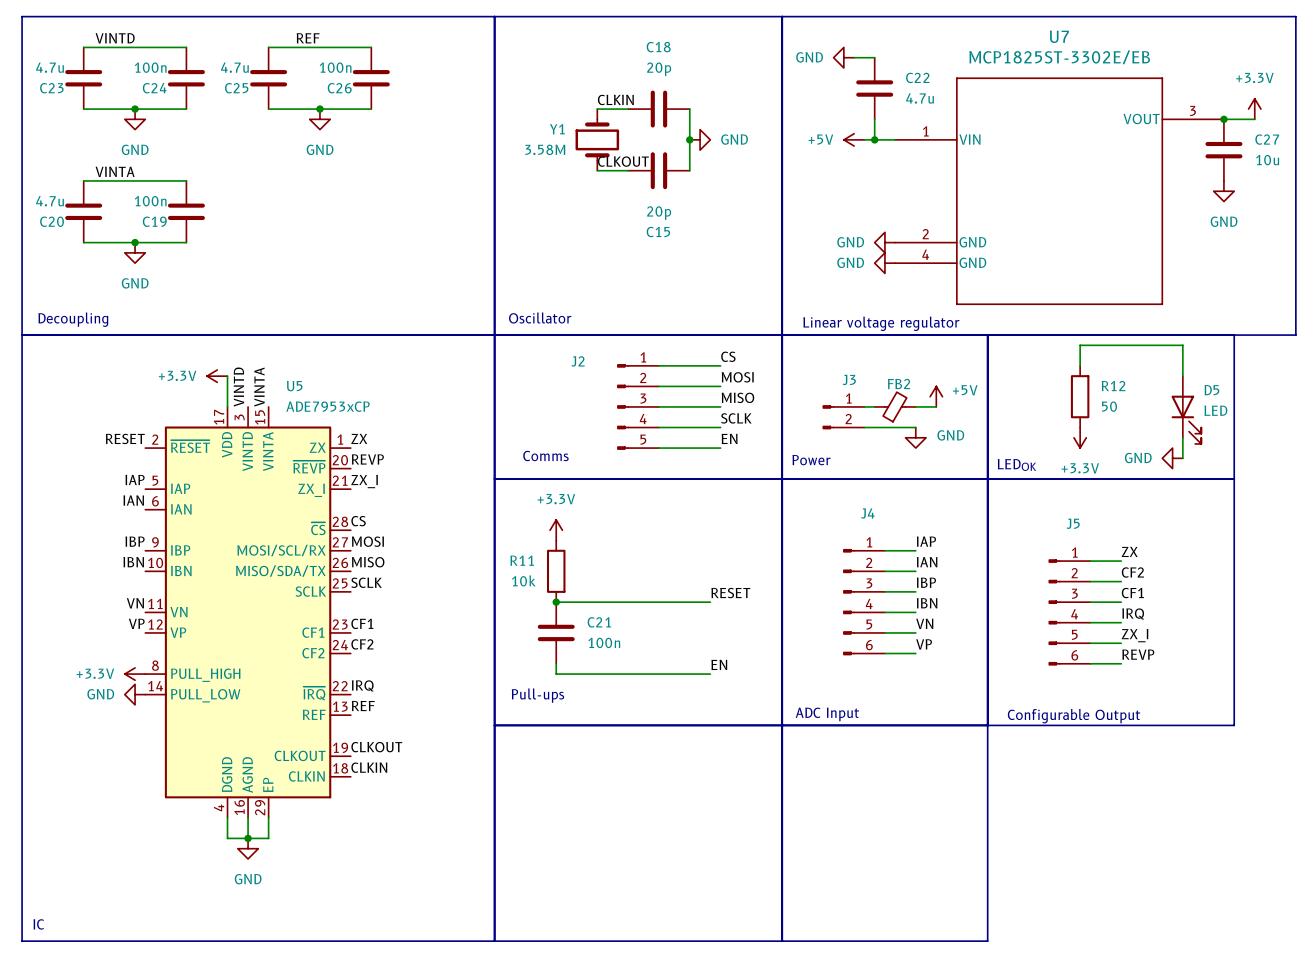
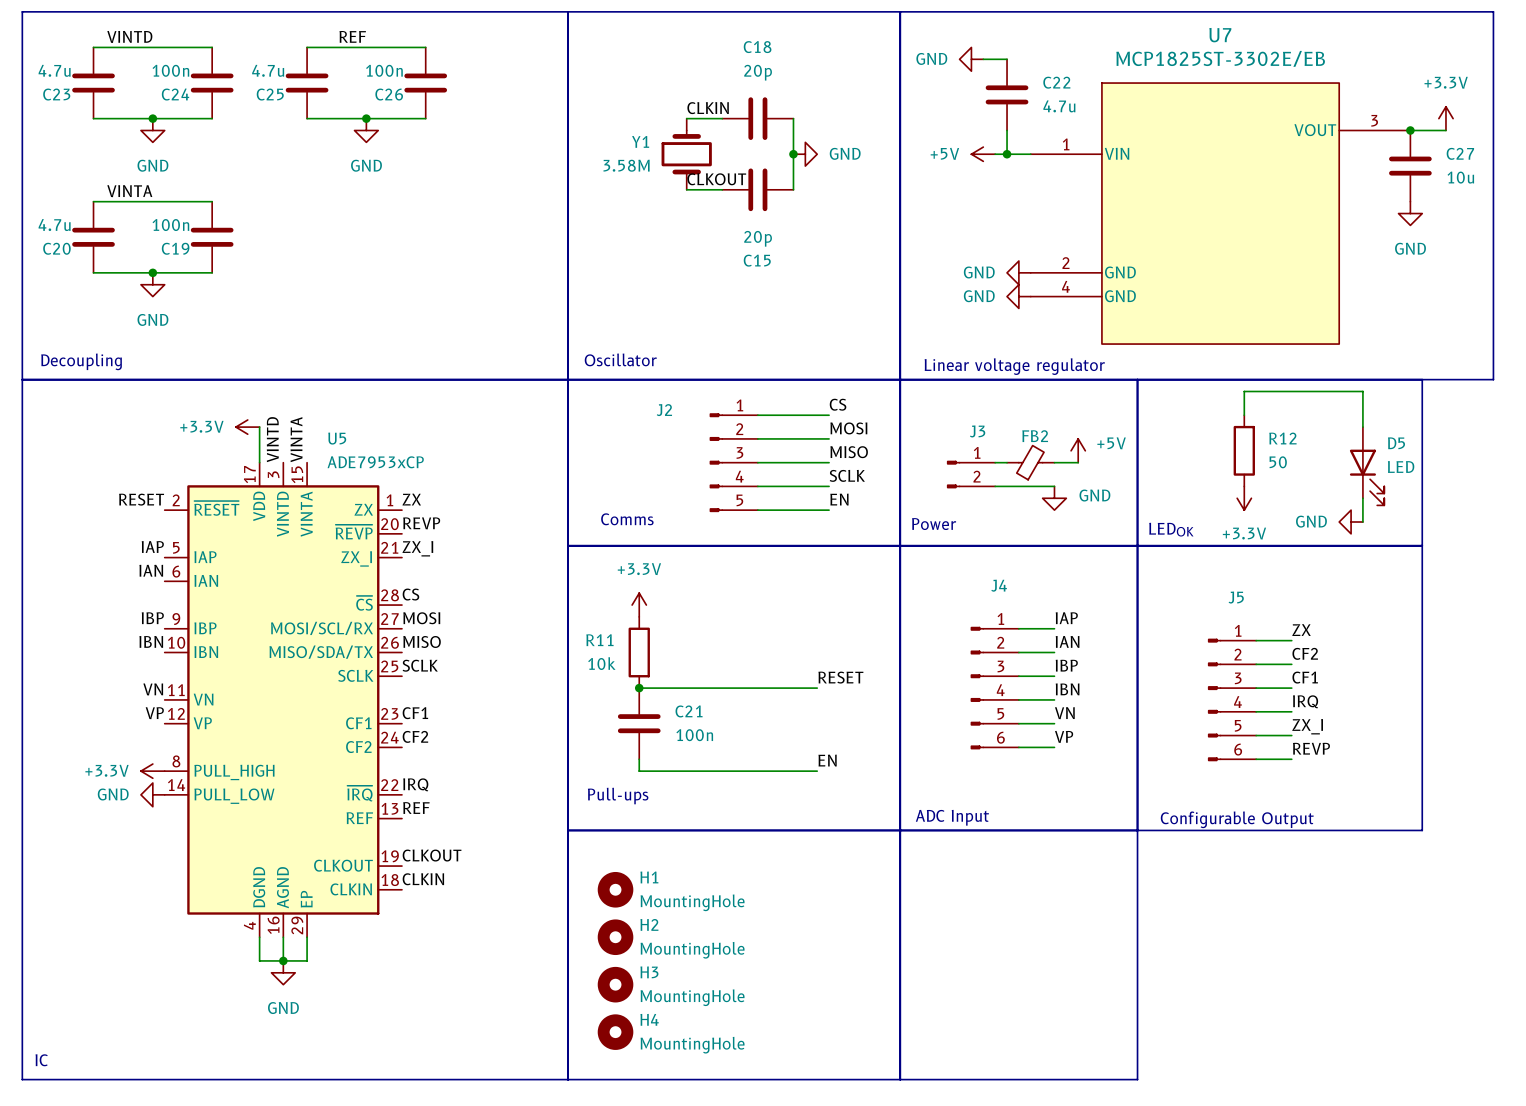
U7 symbol: [895, 77, 1224, 305] -> [1030, 83, 1411, 345]
H1: none -> MountingHole (615, 889)
H2: none -> MountingHole (615, 937)
H3: none -> MountingHole (615, 984)
H4: none -> MountingHole (615, 1032)

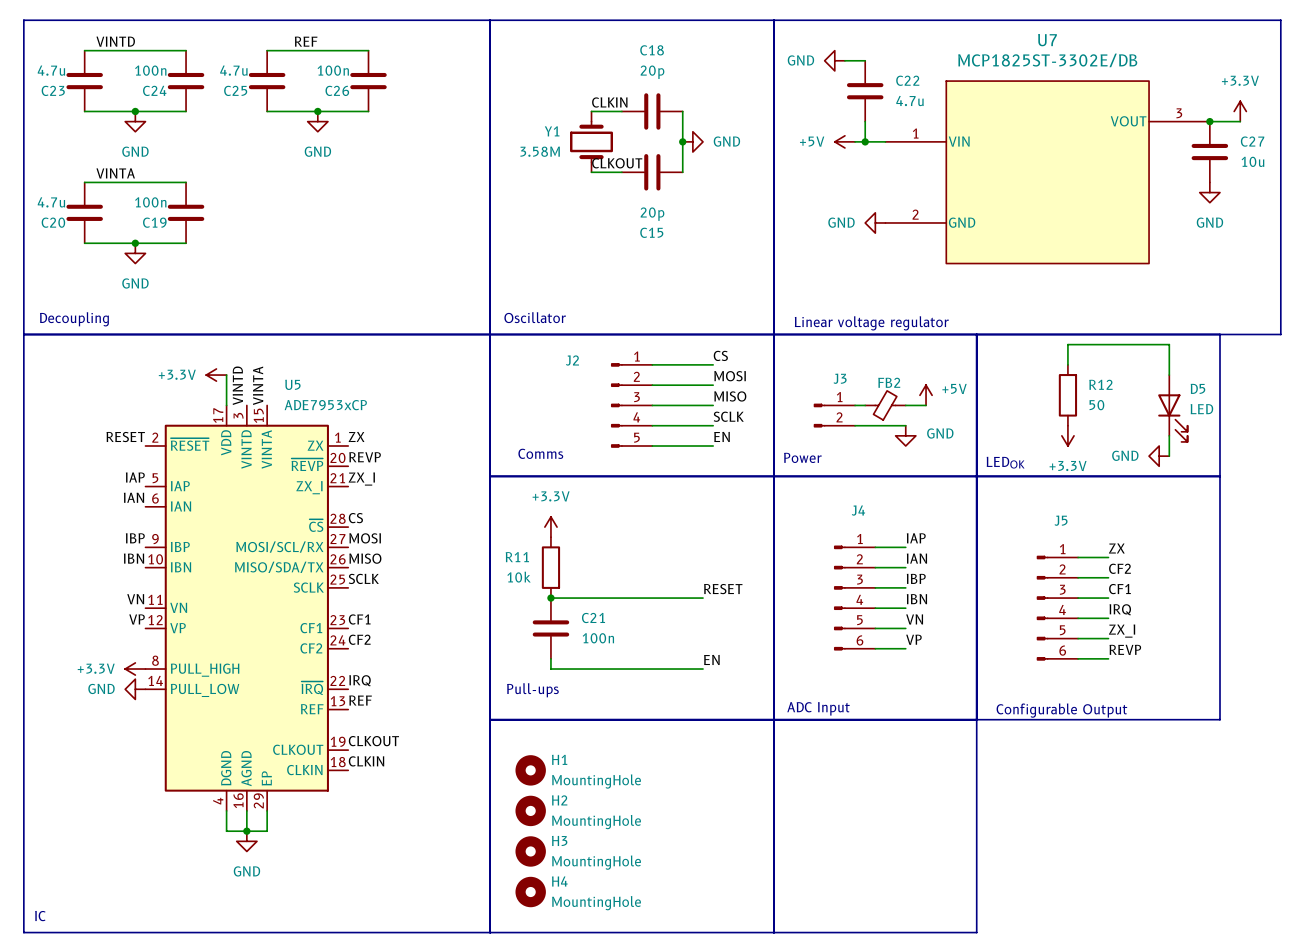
U7 value: MCP1825ST-3302E/EB (1220, 58) -> MCP1825ST-3302E/DB (1047, 60)
U7 symbol: [1030, 83, 1411, 345] -> [885, 81, 1210, 264]
power symbol: none -> GND (875, 222)
power symbol: GND (1018, 272) -> none
power symbol: GND (1018, 296) -> none

